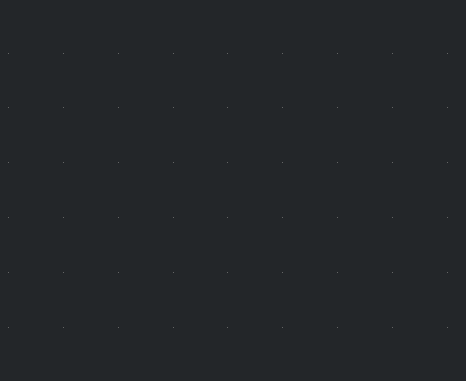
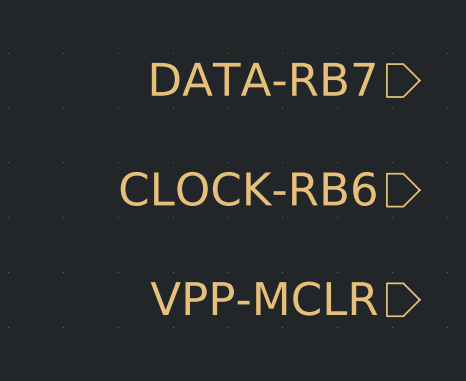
hierarchical label: none -> DATA-RB7 (263, 79)
hierarchical label: none -> CLOCK-RB6 (248, 188)
hierarchical label: none -> VPP-MCLR (263, 298)

